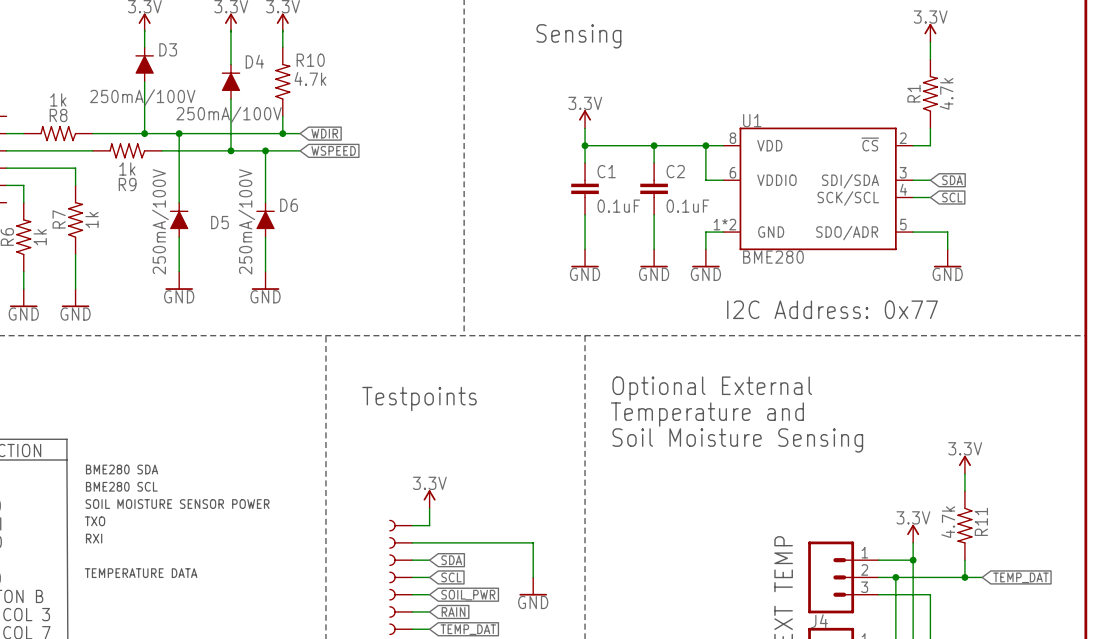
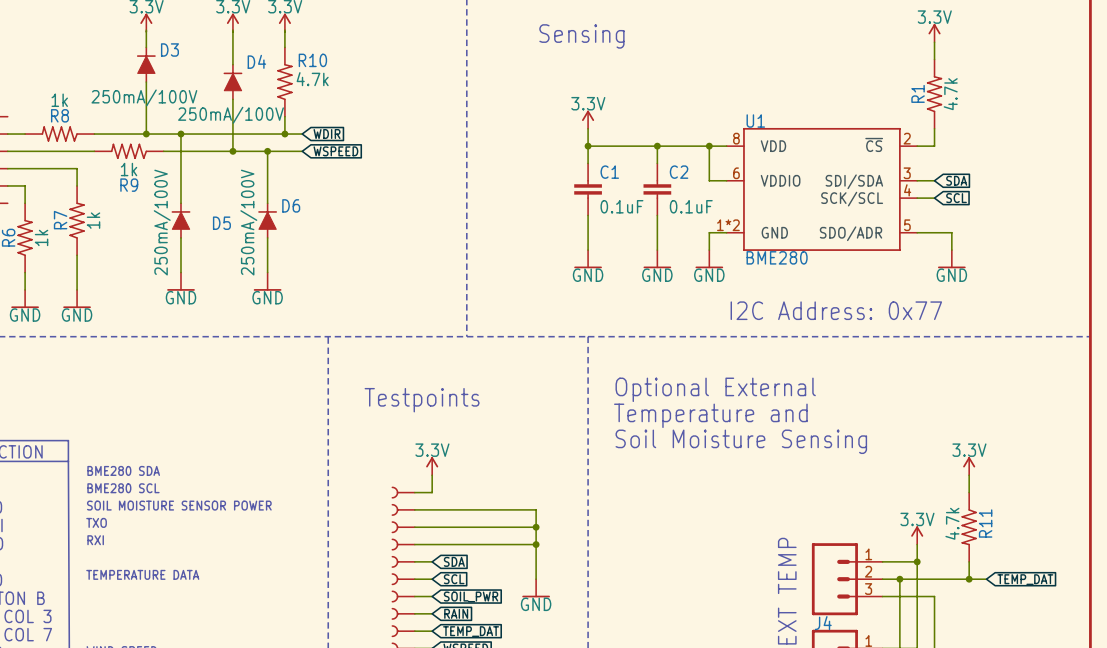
wire: none -> (432, 475) (432, 492) (414, 492)
part: none -> (403, 492)
power symbol position: 3.3V (429, 499) -> 3.3V (432, 466)
part: none -> (403, 509)
wire: none -> (414, 509) (536, 509) (536, 544)
wire: (429, 508) (429, 525) -> (536, 527) (432, 527)
junction: none -> (536, 527)
junction: none -> (536, 544)

